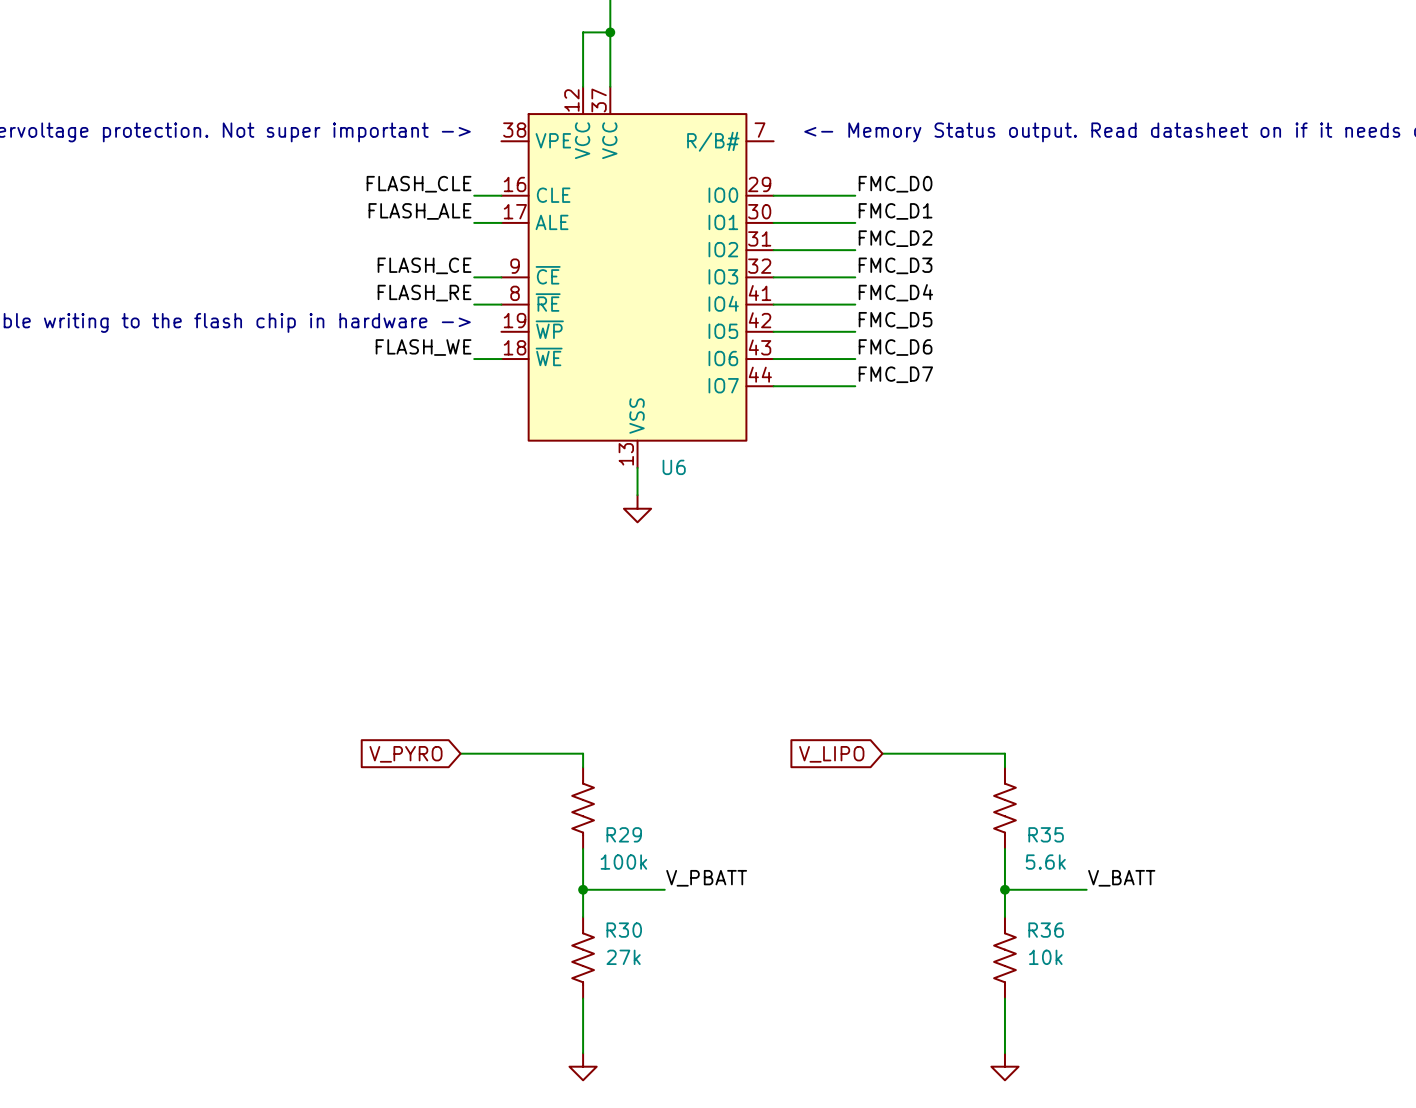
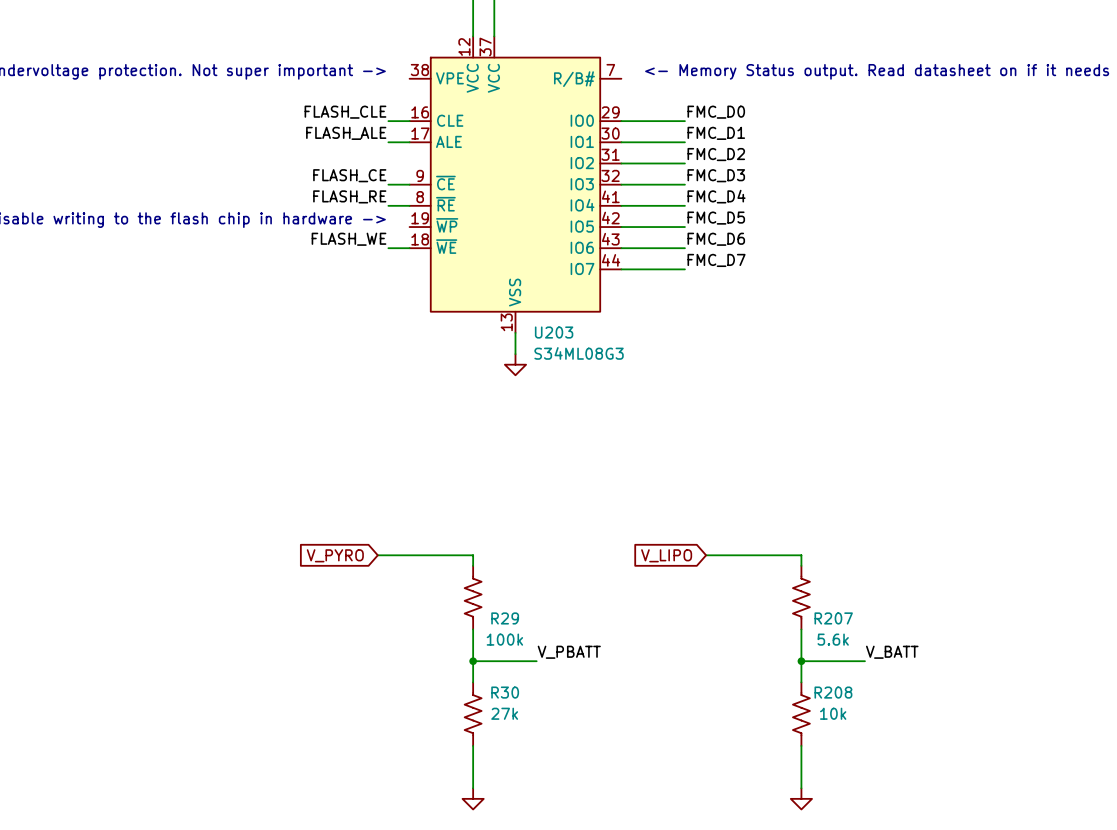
U6 name: U6 (674, 467) -> U203 (554, 332)
U6 value: none -> S34ML08G3 (579, 353)
R35 name: R35 (1046, 834) -> R207 (833, 618)
R36 name: R36 (1046, 930) -> R208 (833, 692)

